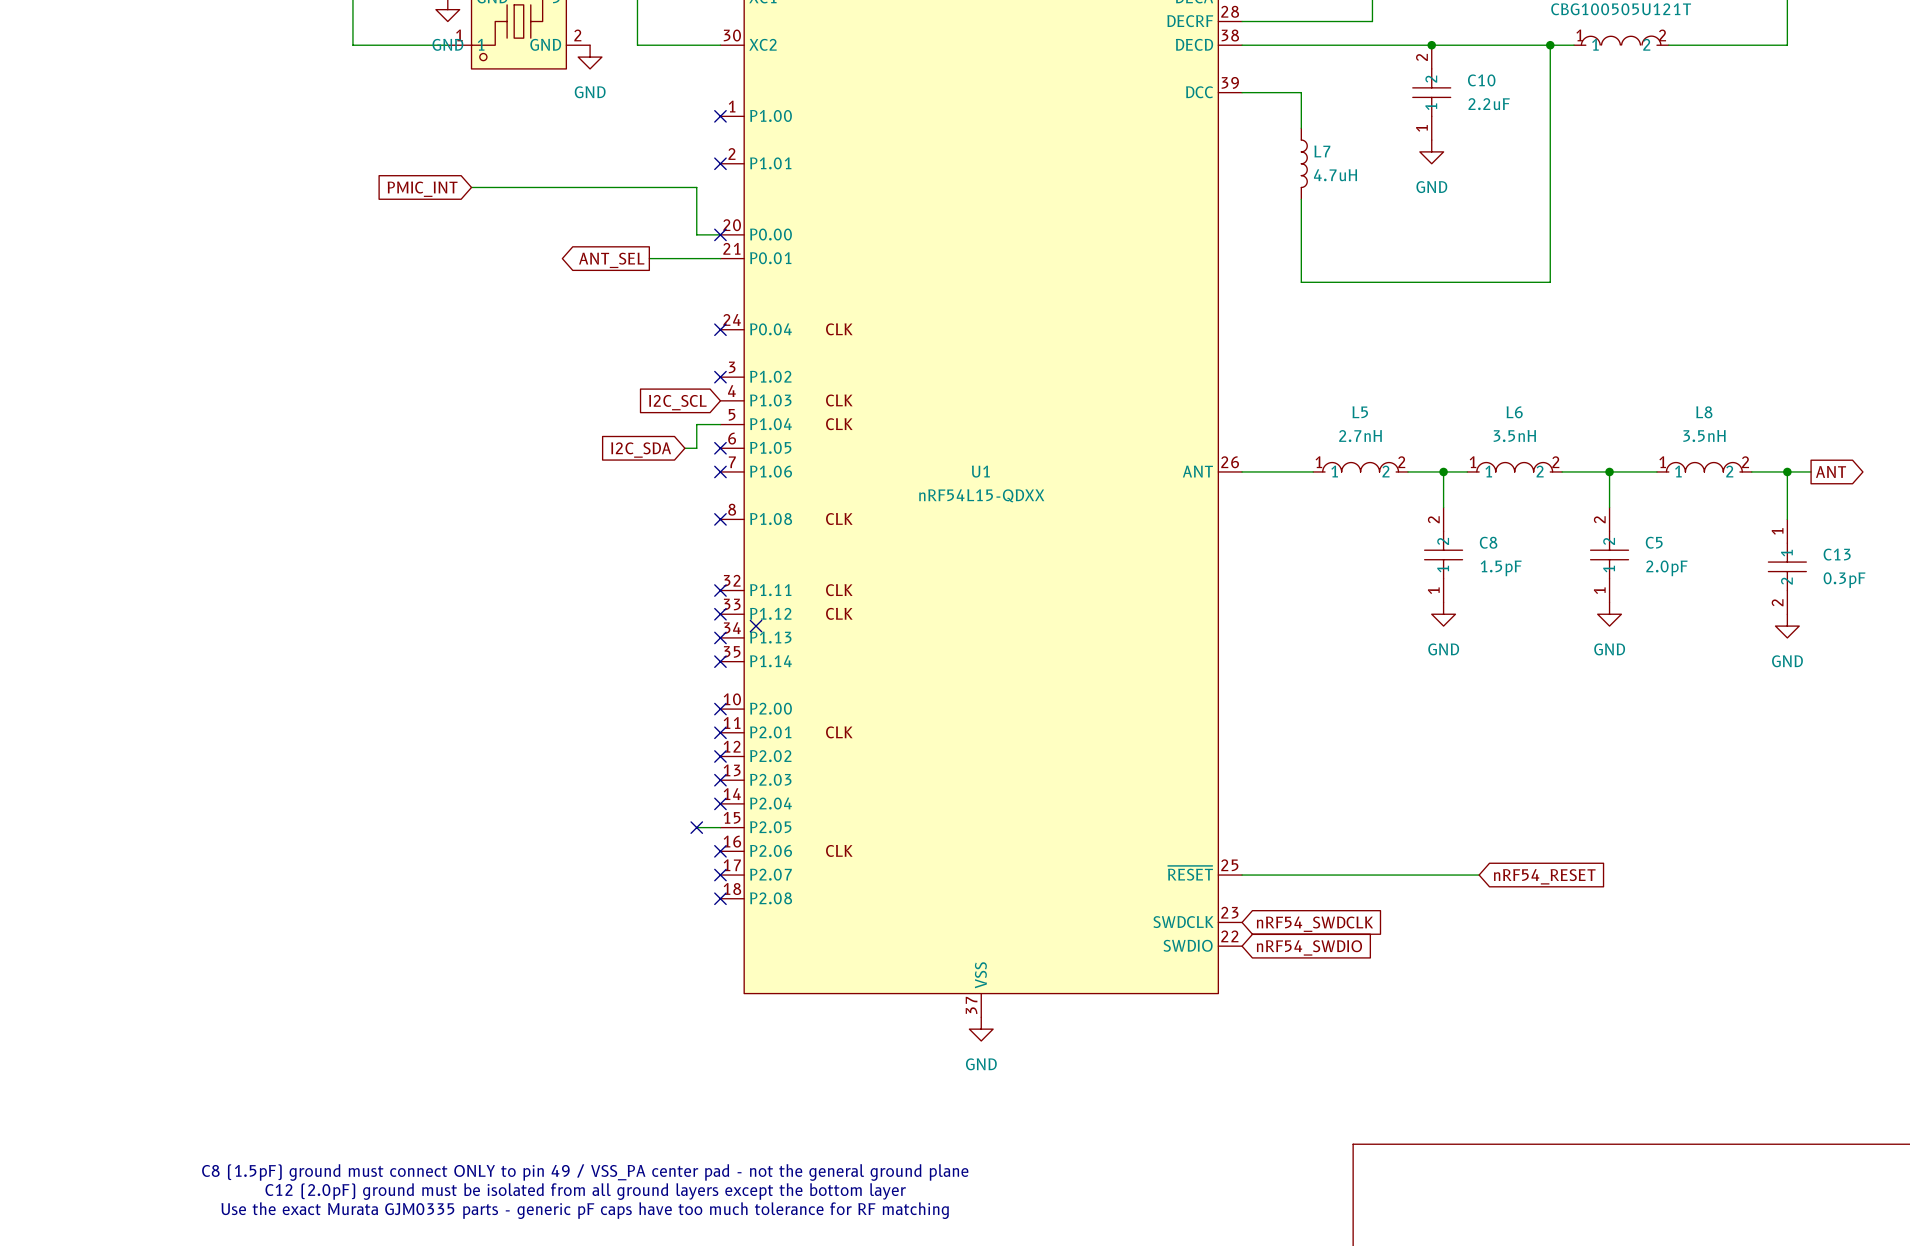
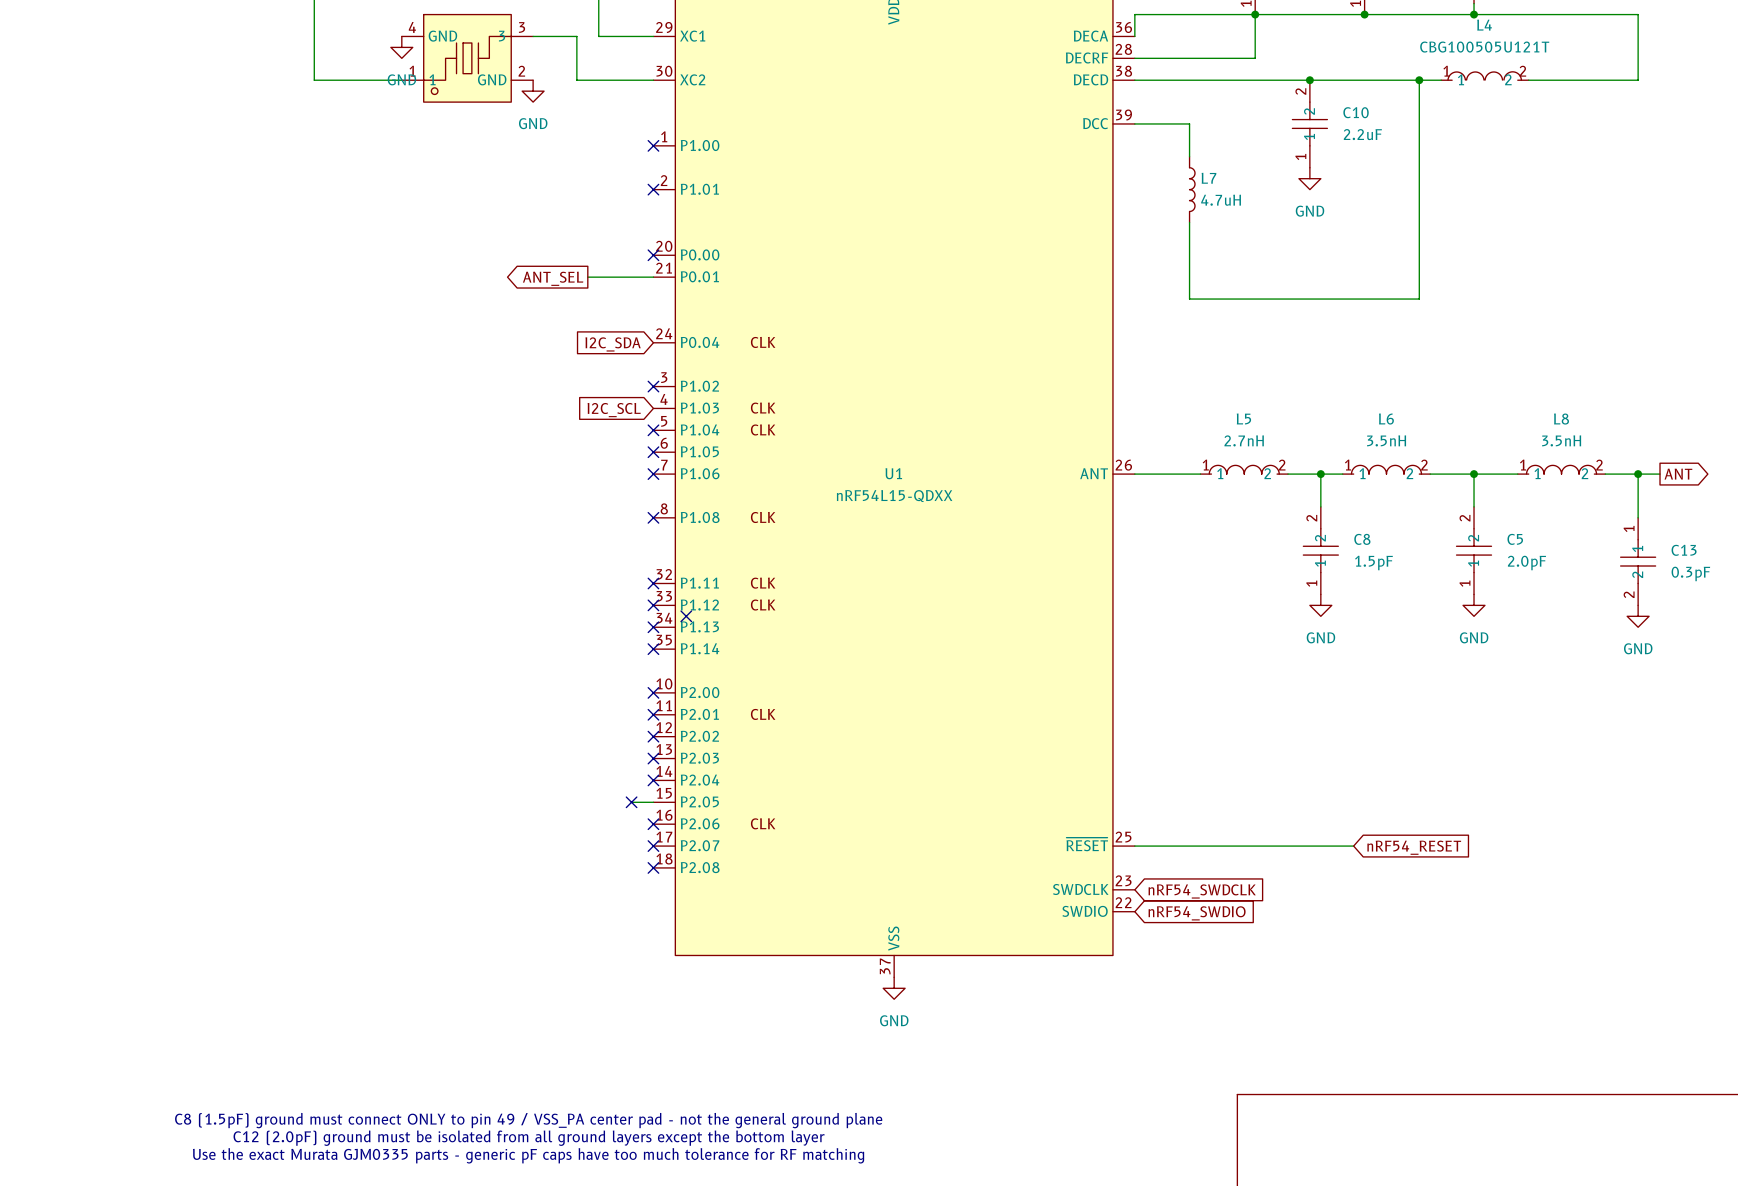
wire: (471, 187) (696, 187) (696, 234) (720, 234) -> none
global label: PMIC_INT (422, 189) -> none
no-connect mark: (720, 329) -> none
wire: (720, 424) (696, 424) (696, 448) (684, 448) -> none
no-connect mark: none -> (653, 430)
global label position: I2C_SDA (641, 450) -> I2C_SDA (613, 344)

